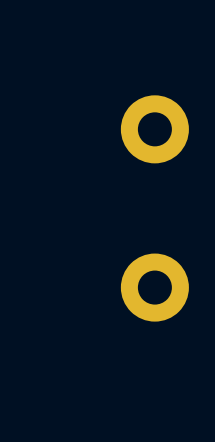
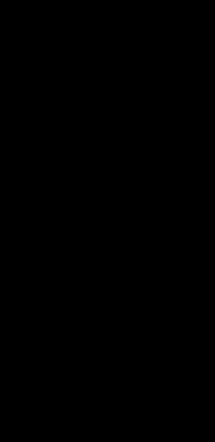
part: (154, 129) -> none
part: (154, 287) -> none

